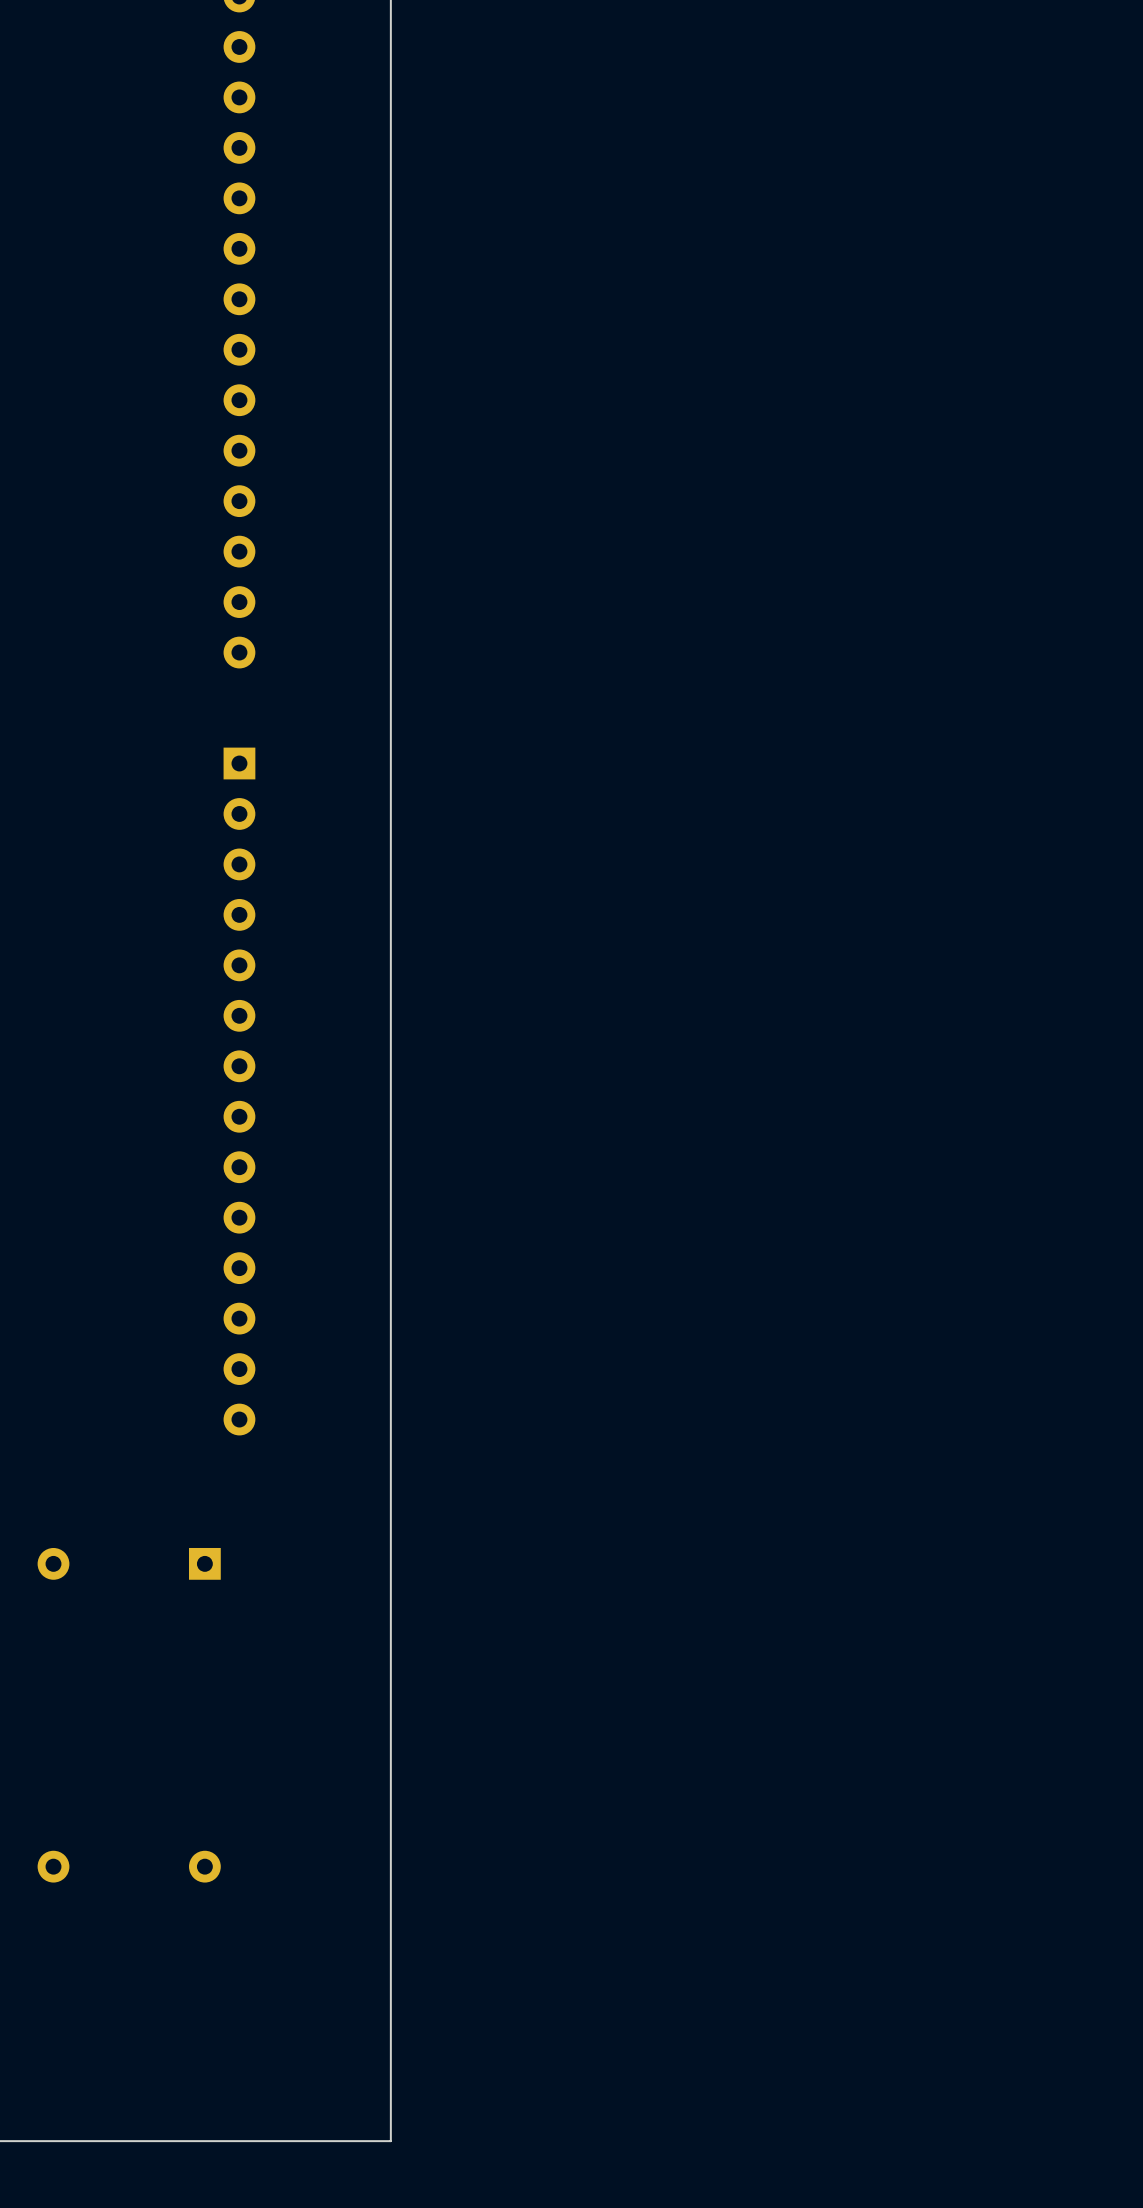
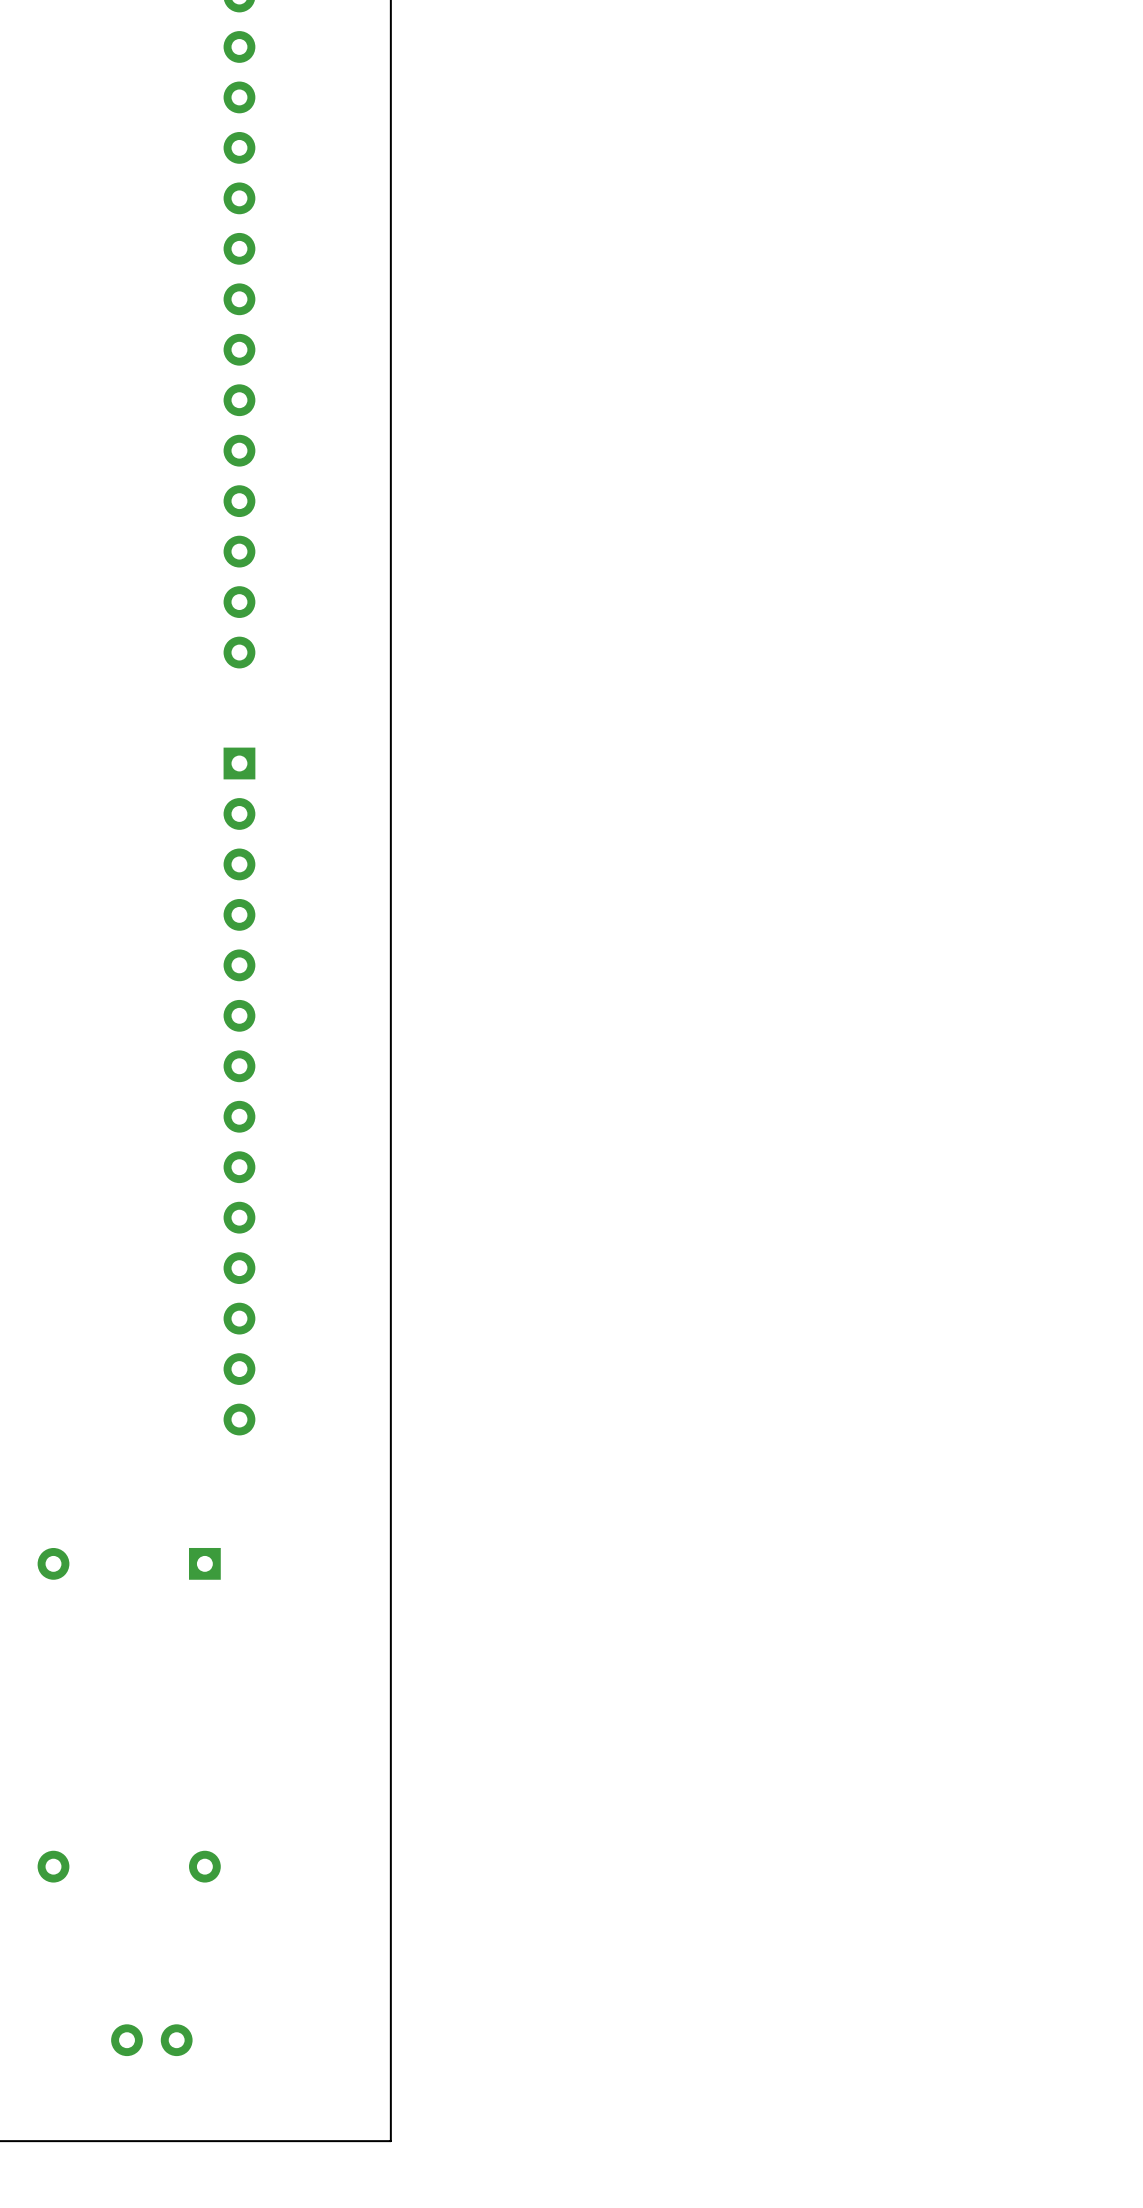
part: none -> (151, 2040)

